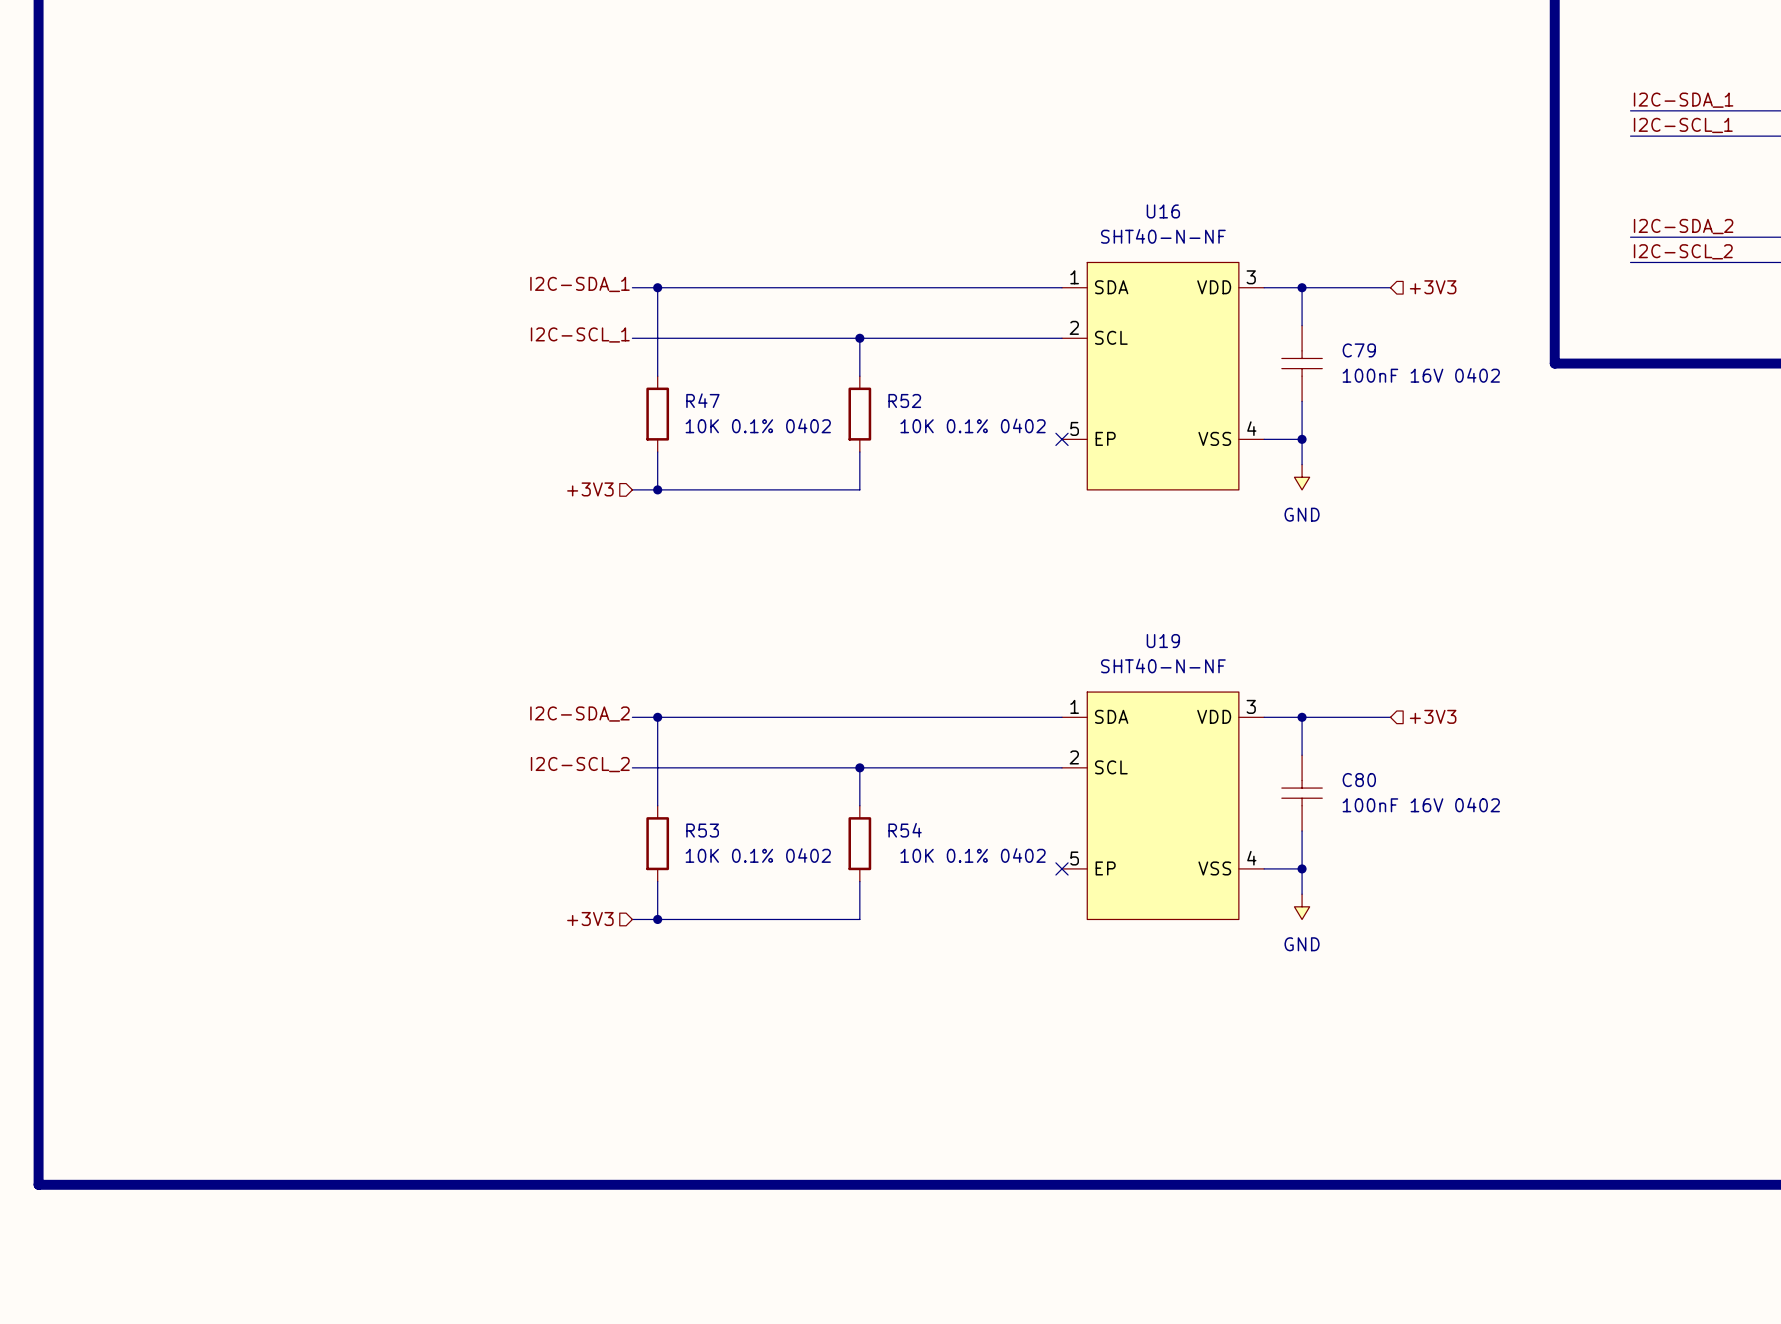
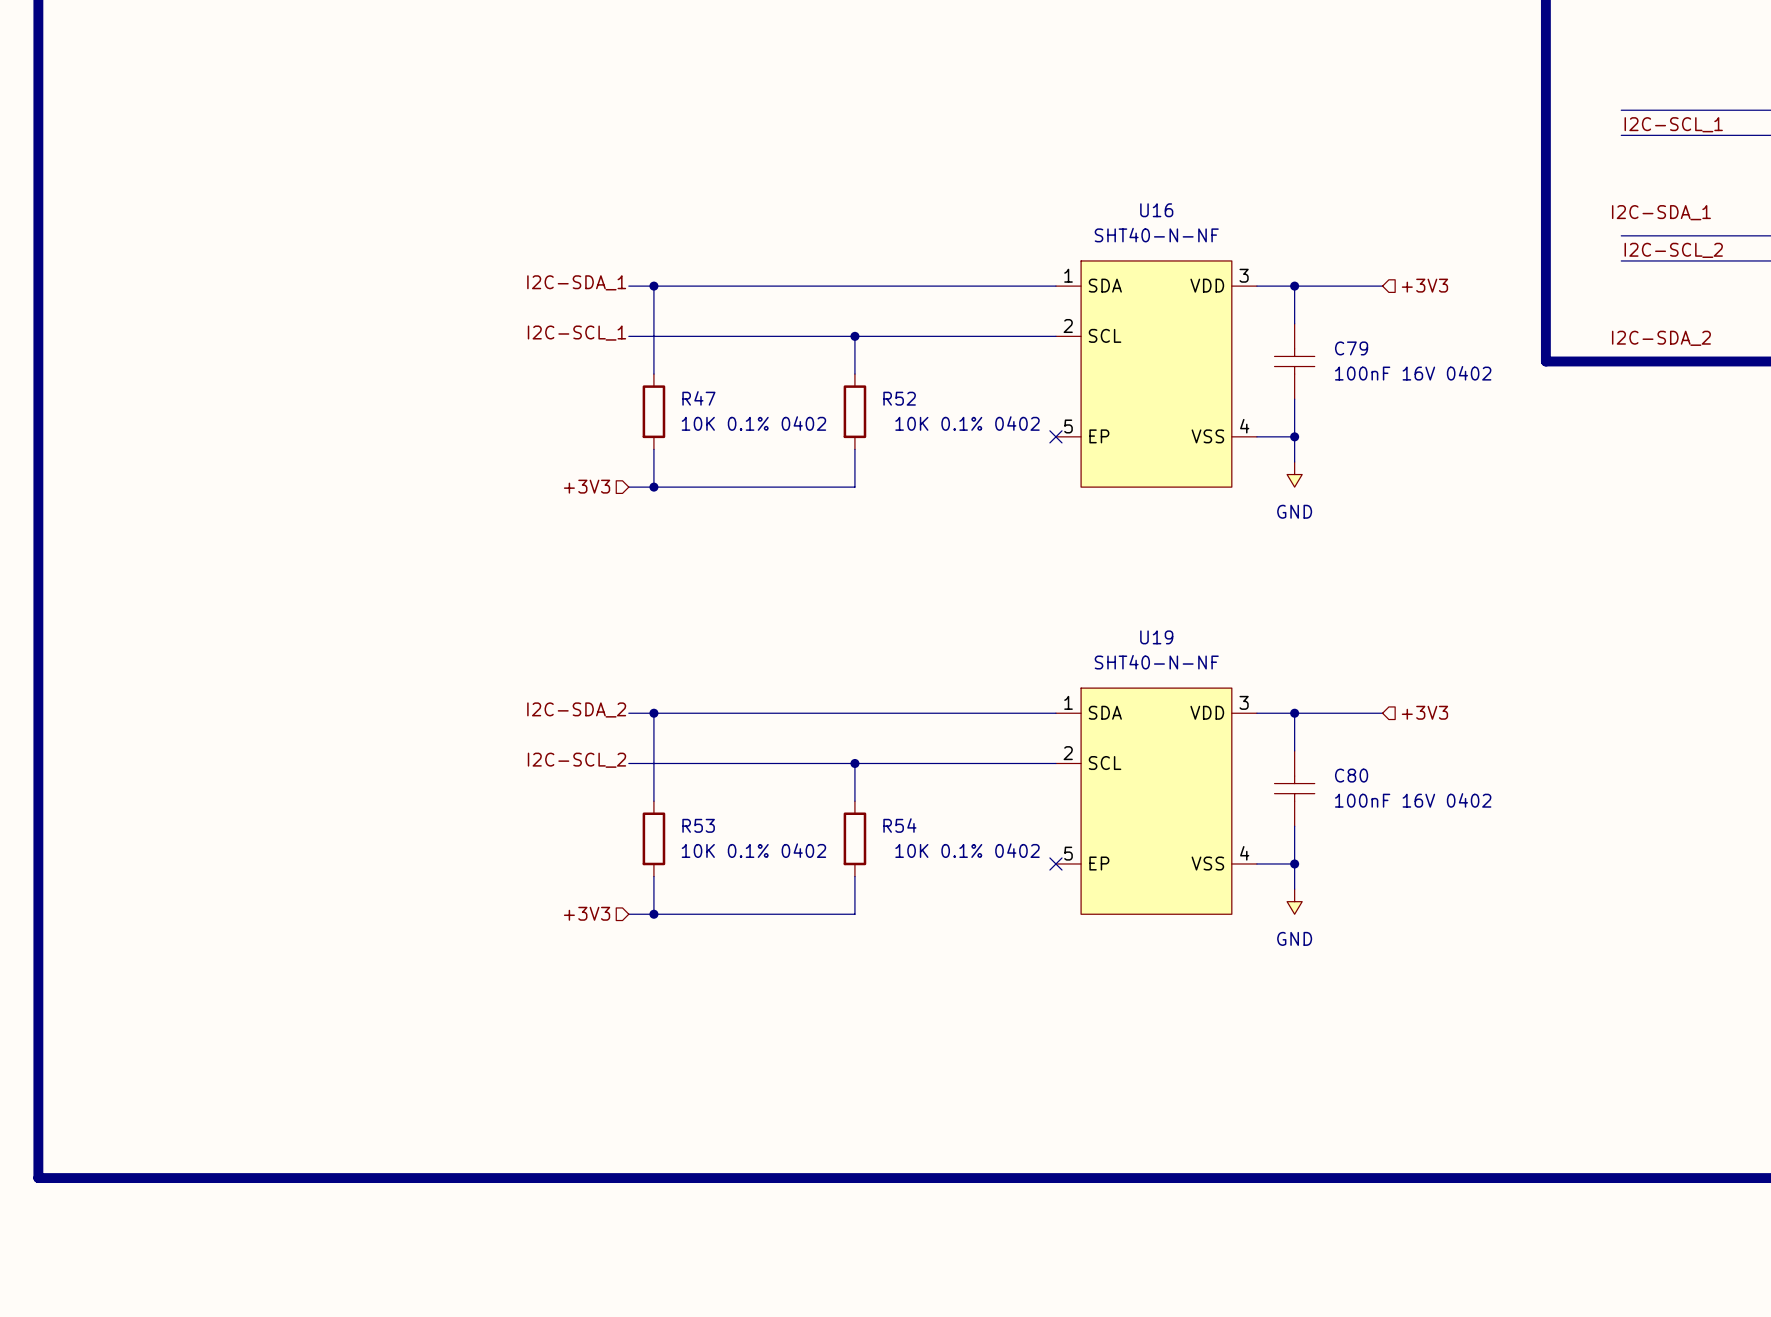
label position: I2C-SDA_1 (1683, 100) -> I2C-SDA_1 (1661, 212)
label position: I2C-SDA_2 (1683, 226) -> I2C-SDA_2 (1661, 338)

